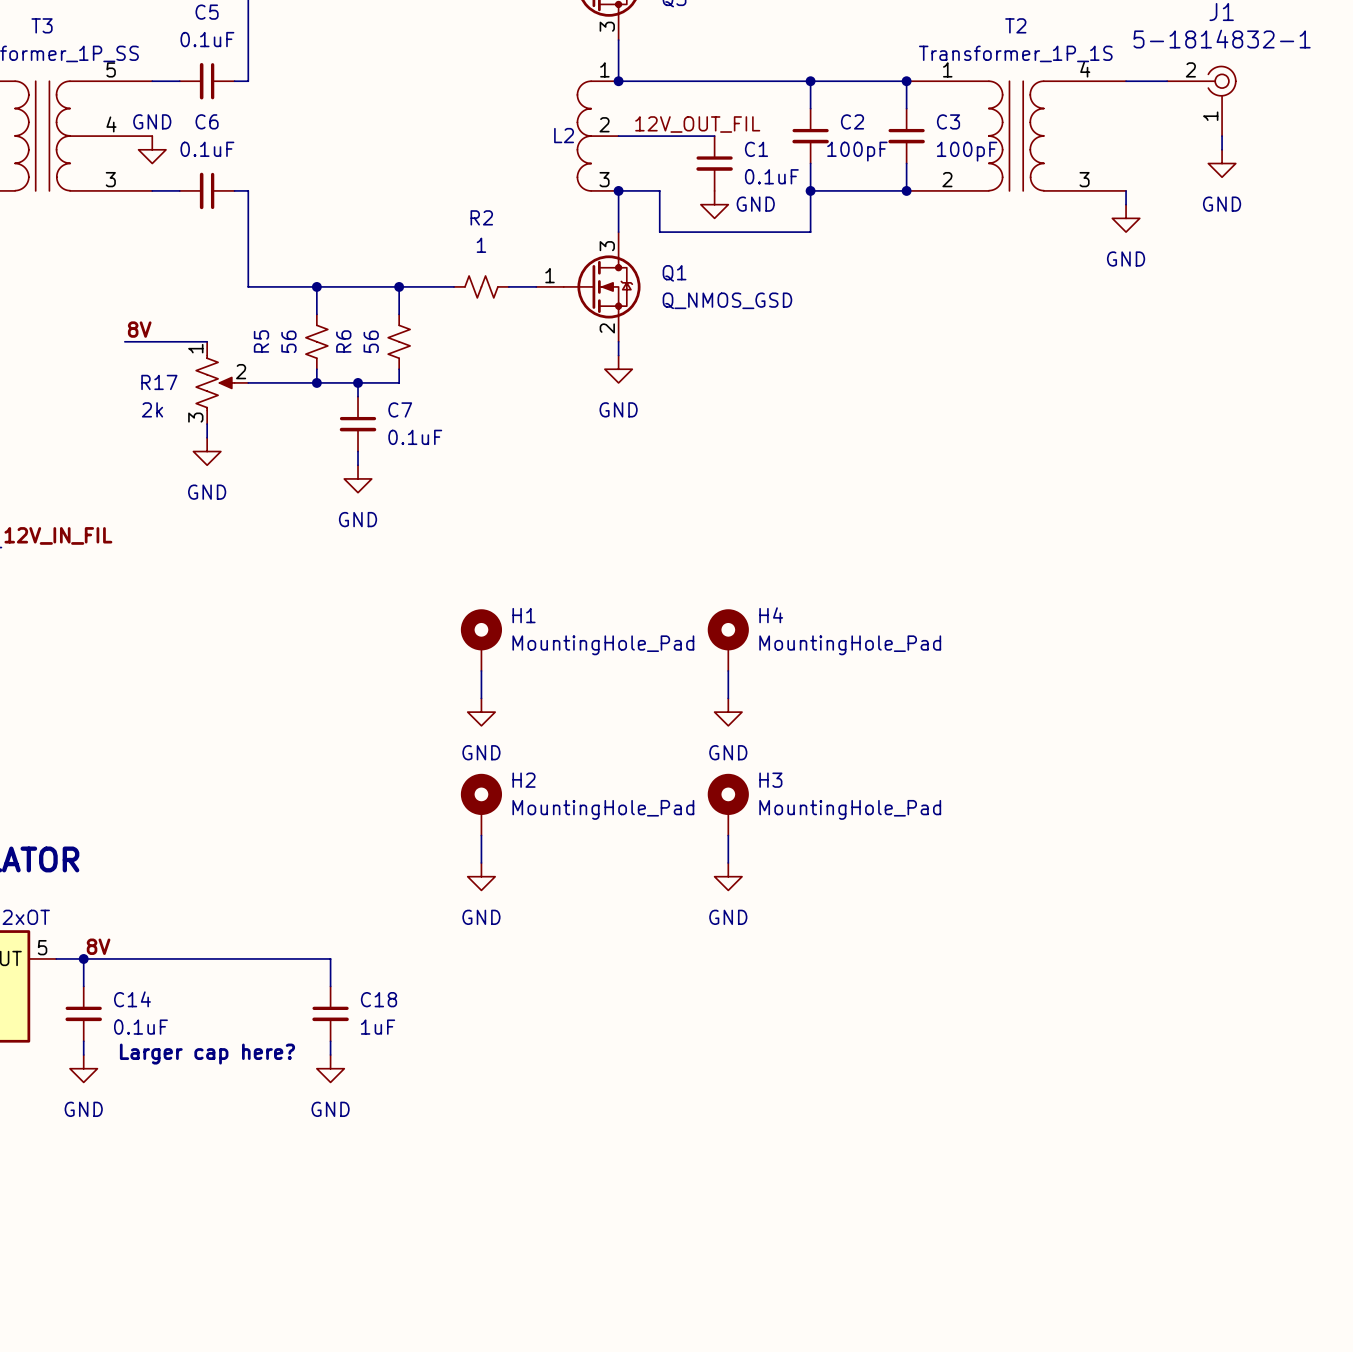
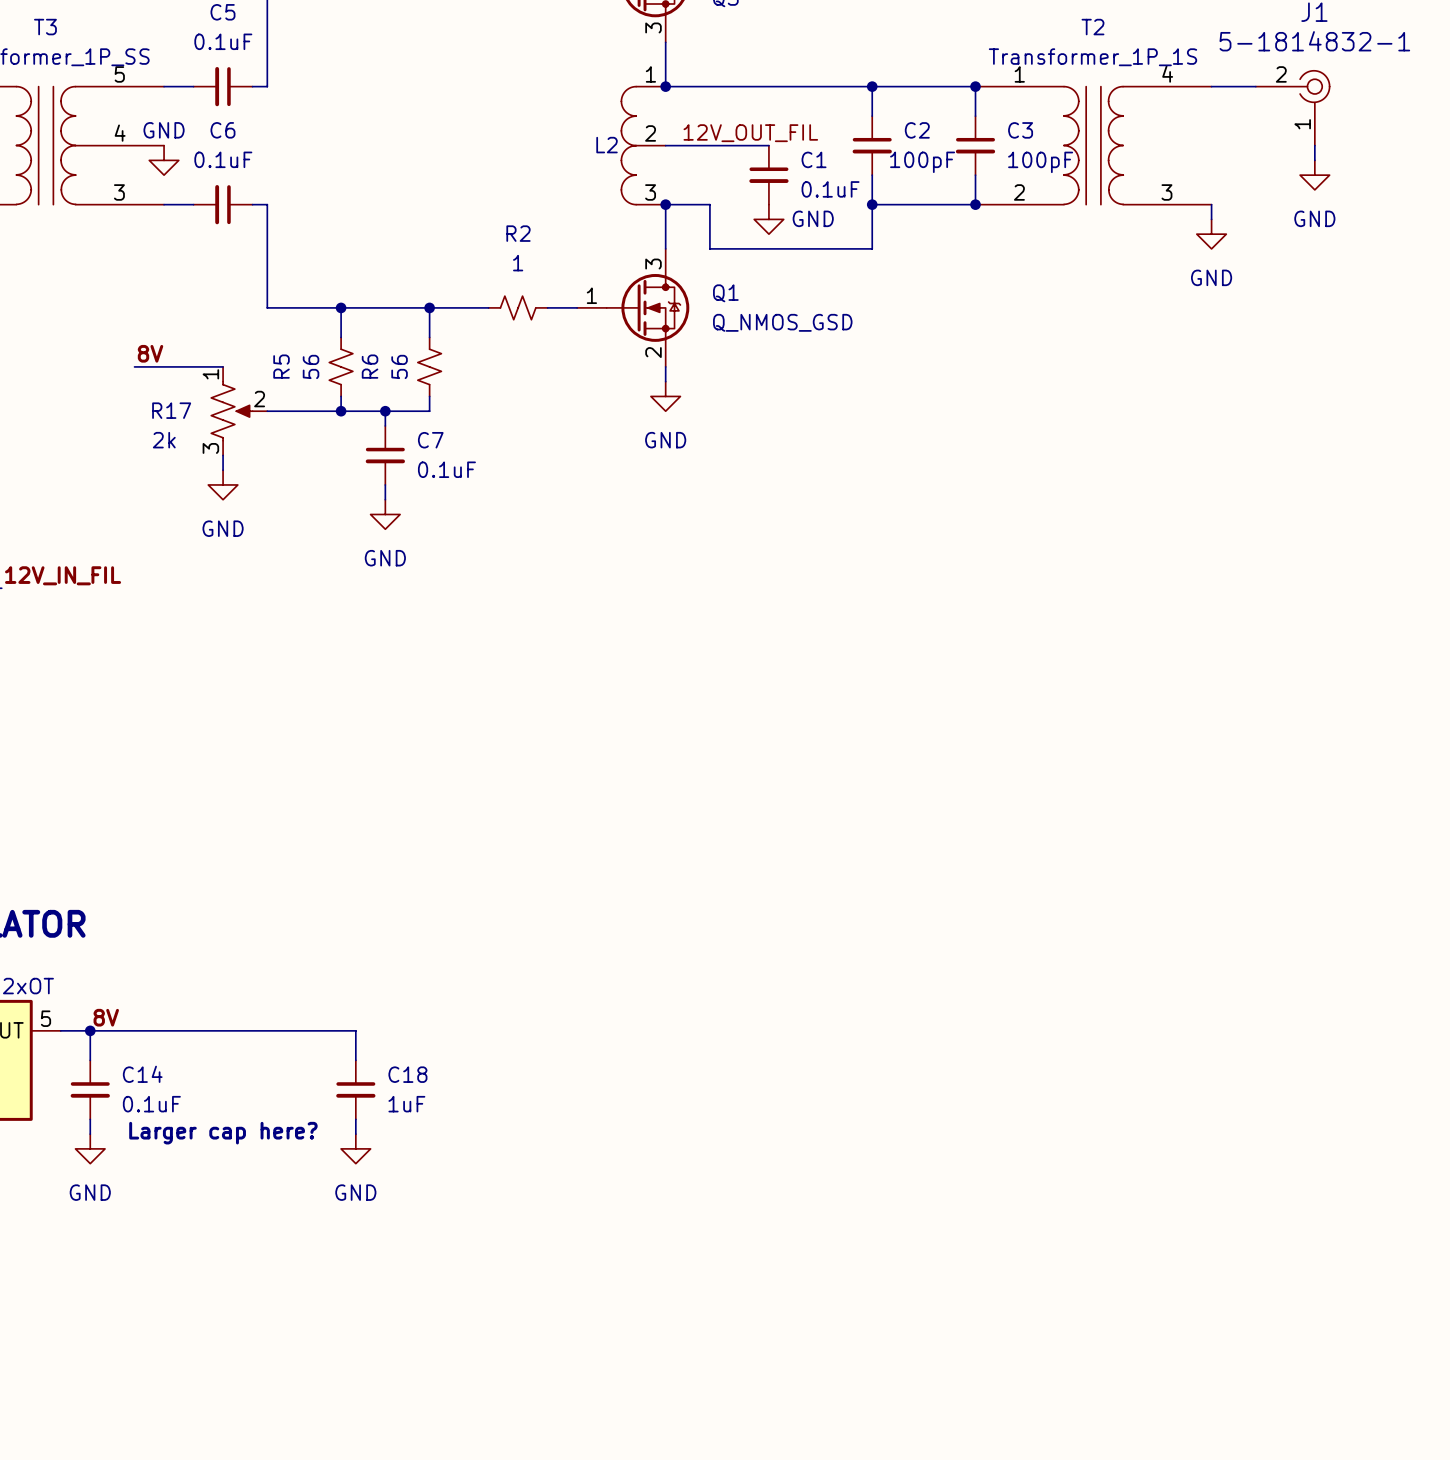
H1: MountingHole_Pad (481, 640) -> none
H4: MountingHole_Pad (728, 640) -> none
wire: (481, 670) (481, 698) -> none
wire: (728, 670) (728, 698) -> none
power symbol: GND (481, 712) -> none
power symbol: GND (728, 712) -> none
H2: MountingHole_Pad (481, 804) -> none
H3: MountingHole_Pad (728, 804) -> none
wire: (481, 835) (481, 862) -> none
wire: (728, 835) (728, 862) -> none
power symbol: GND (481, 876) -> none
power symbol: GND (728, 876) -> none

